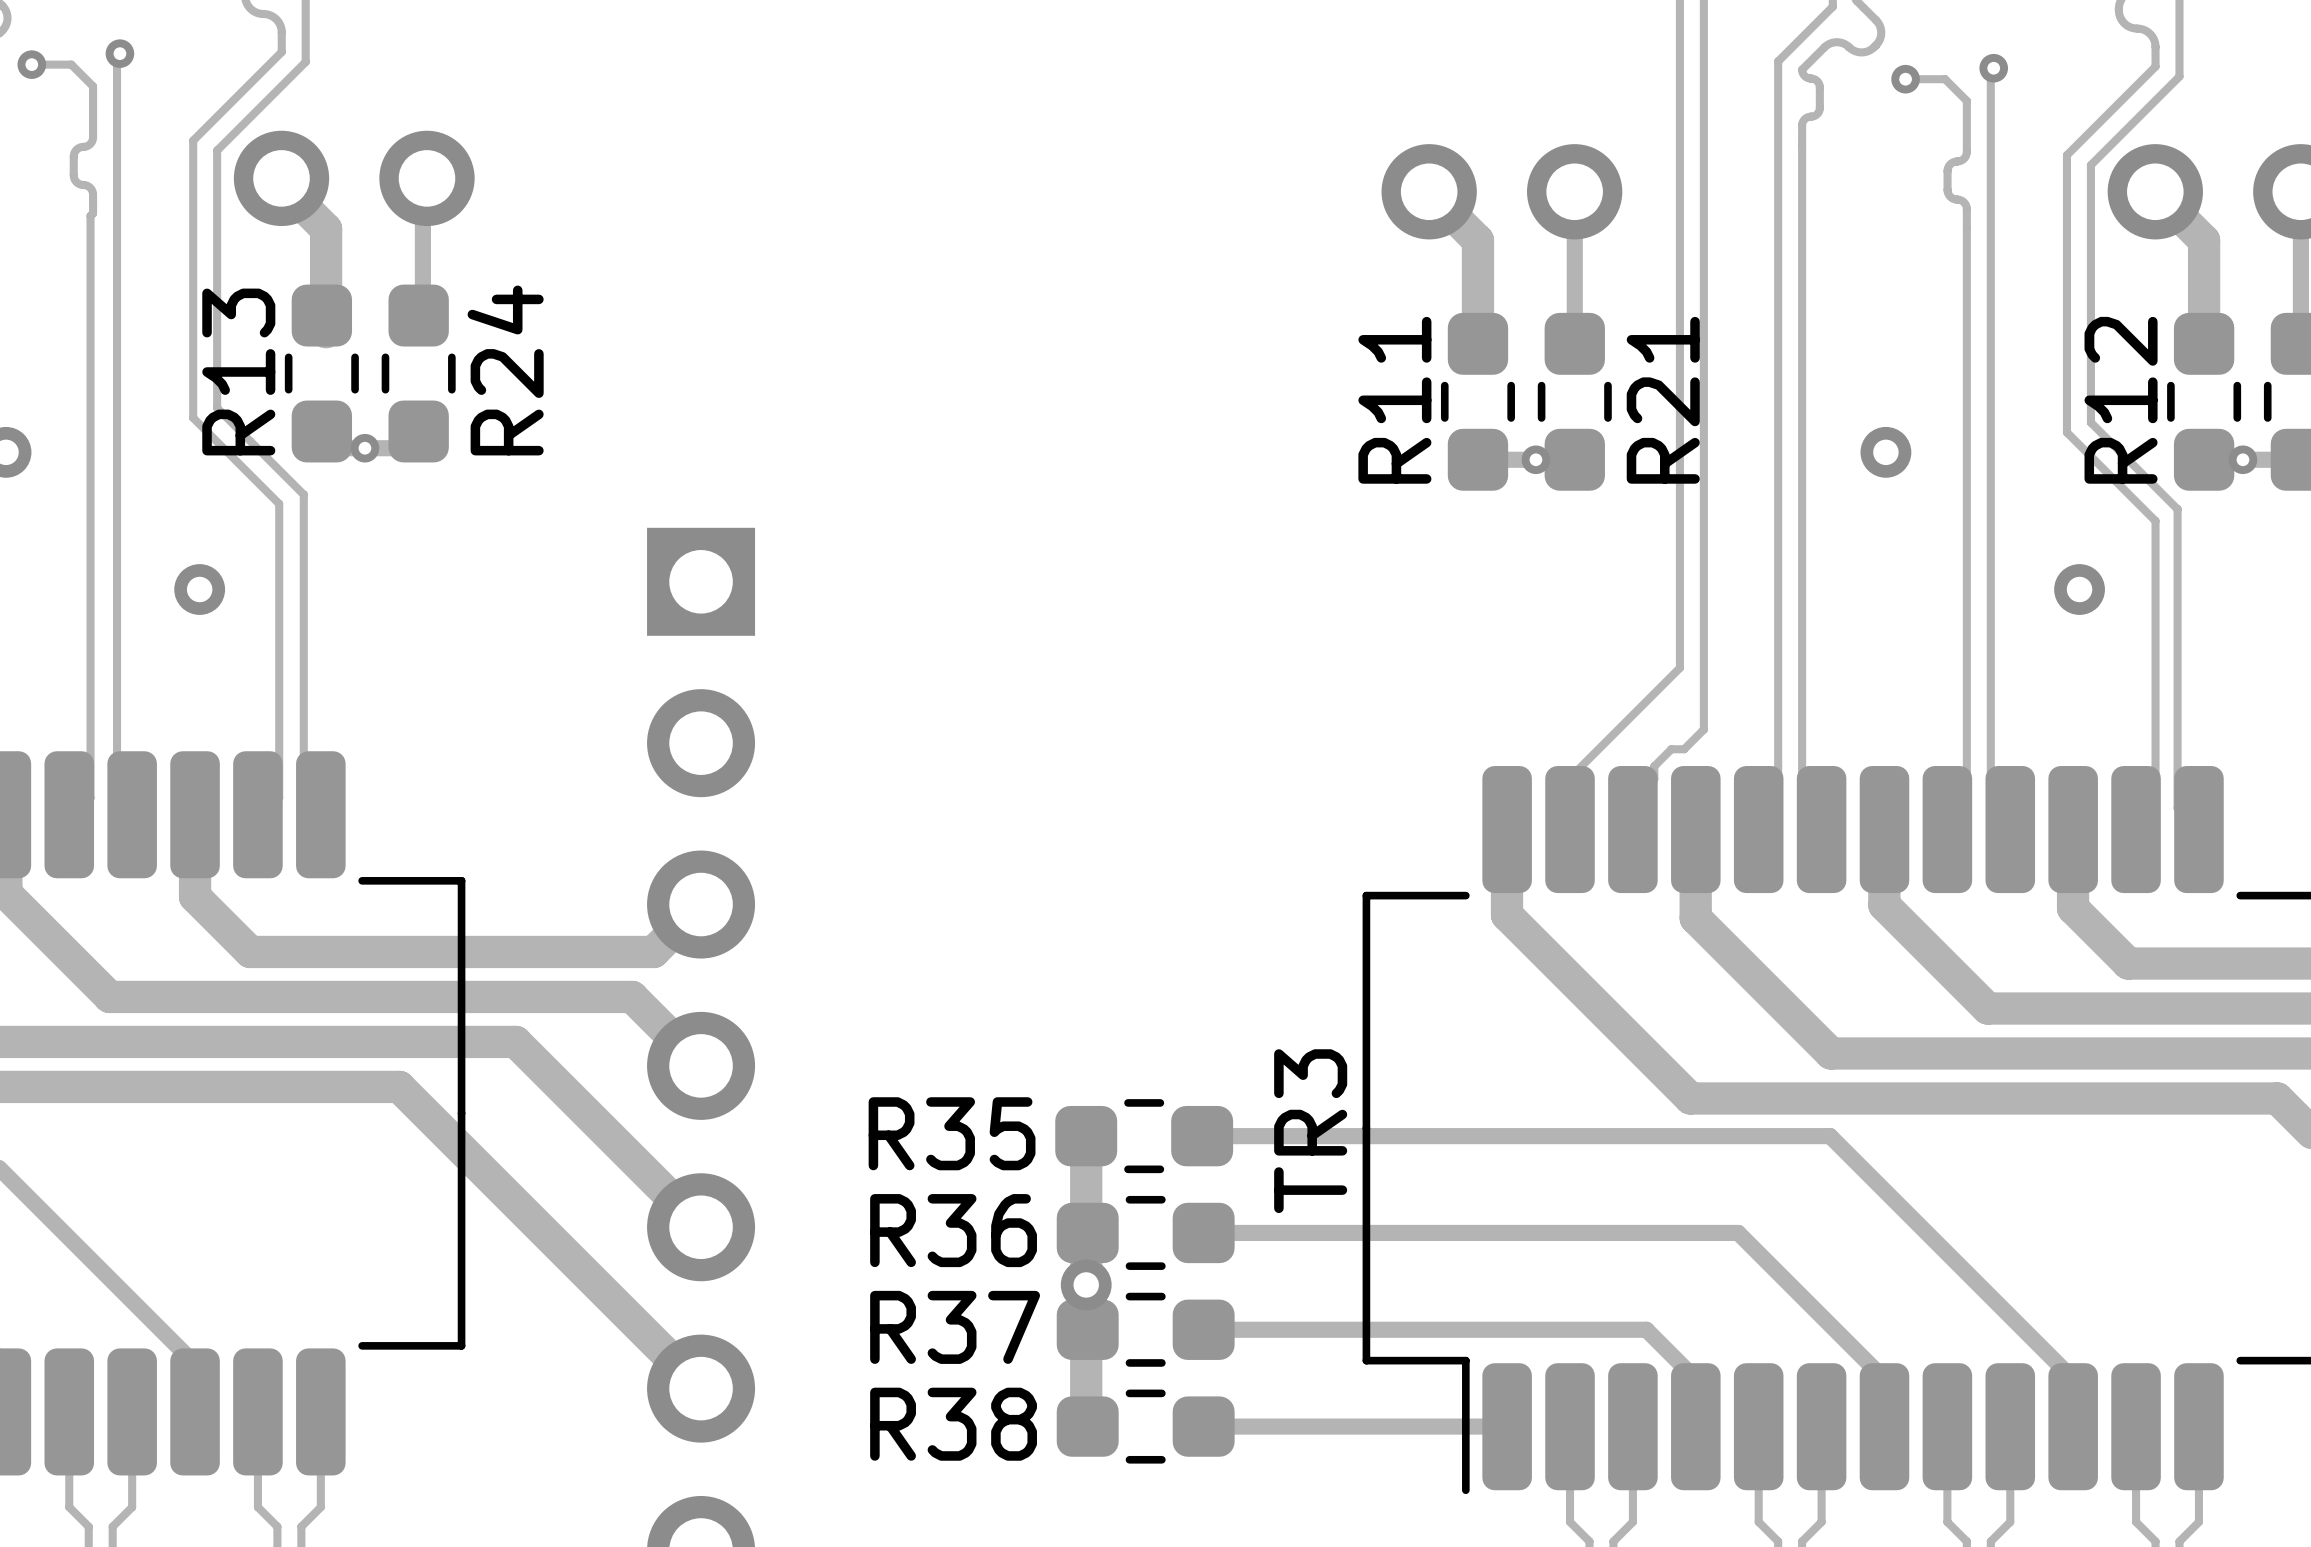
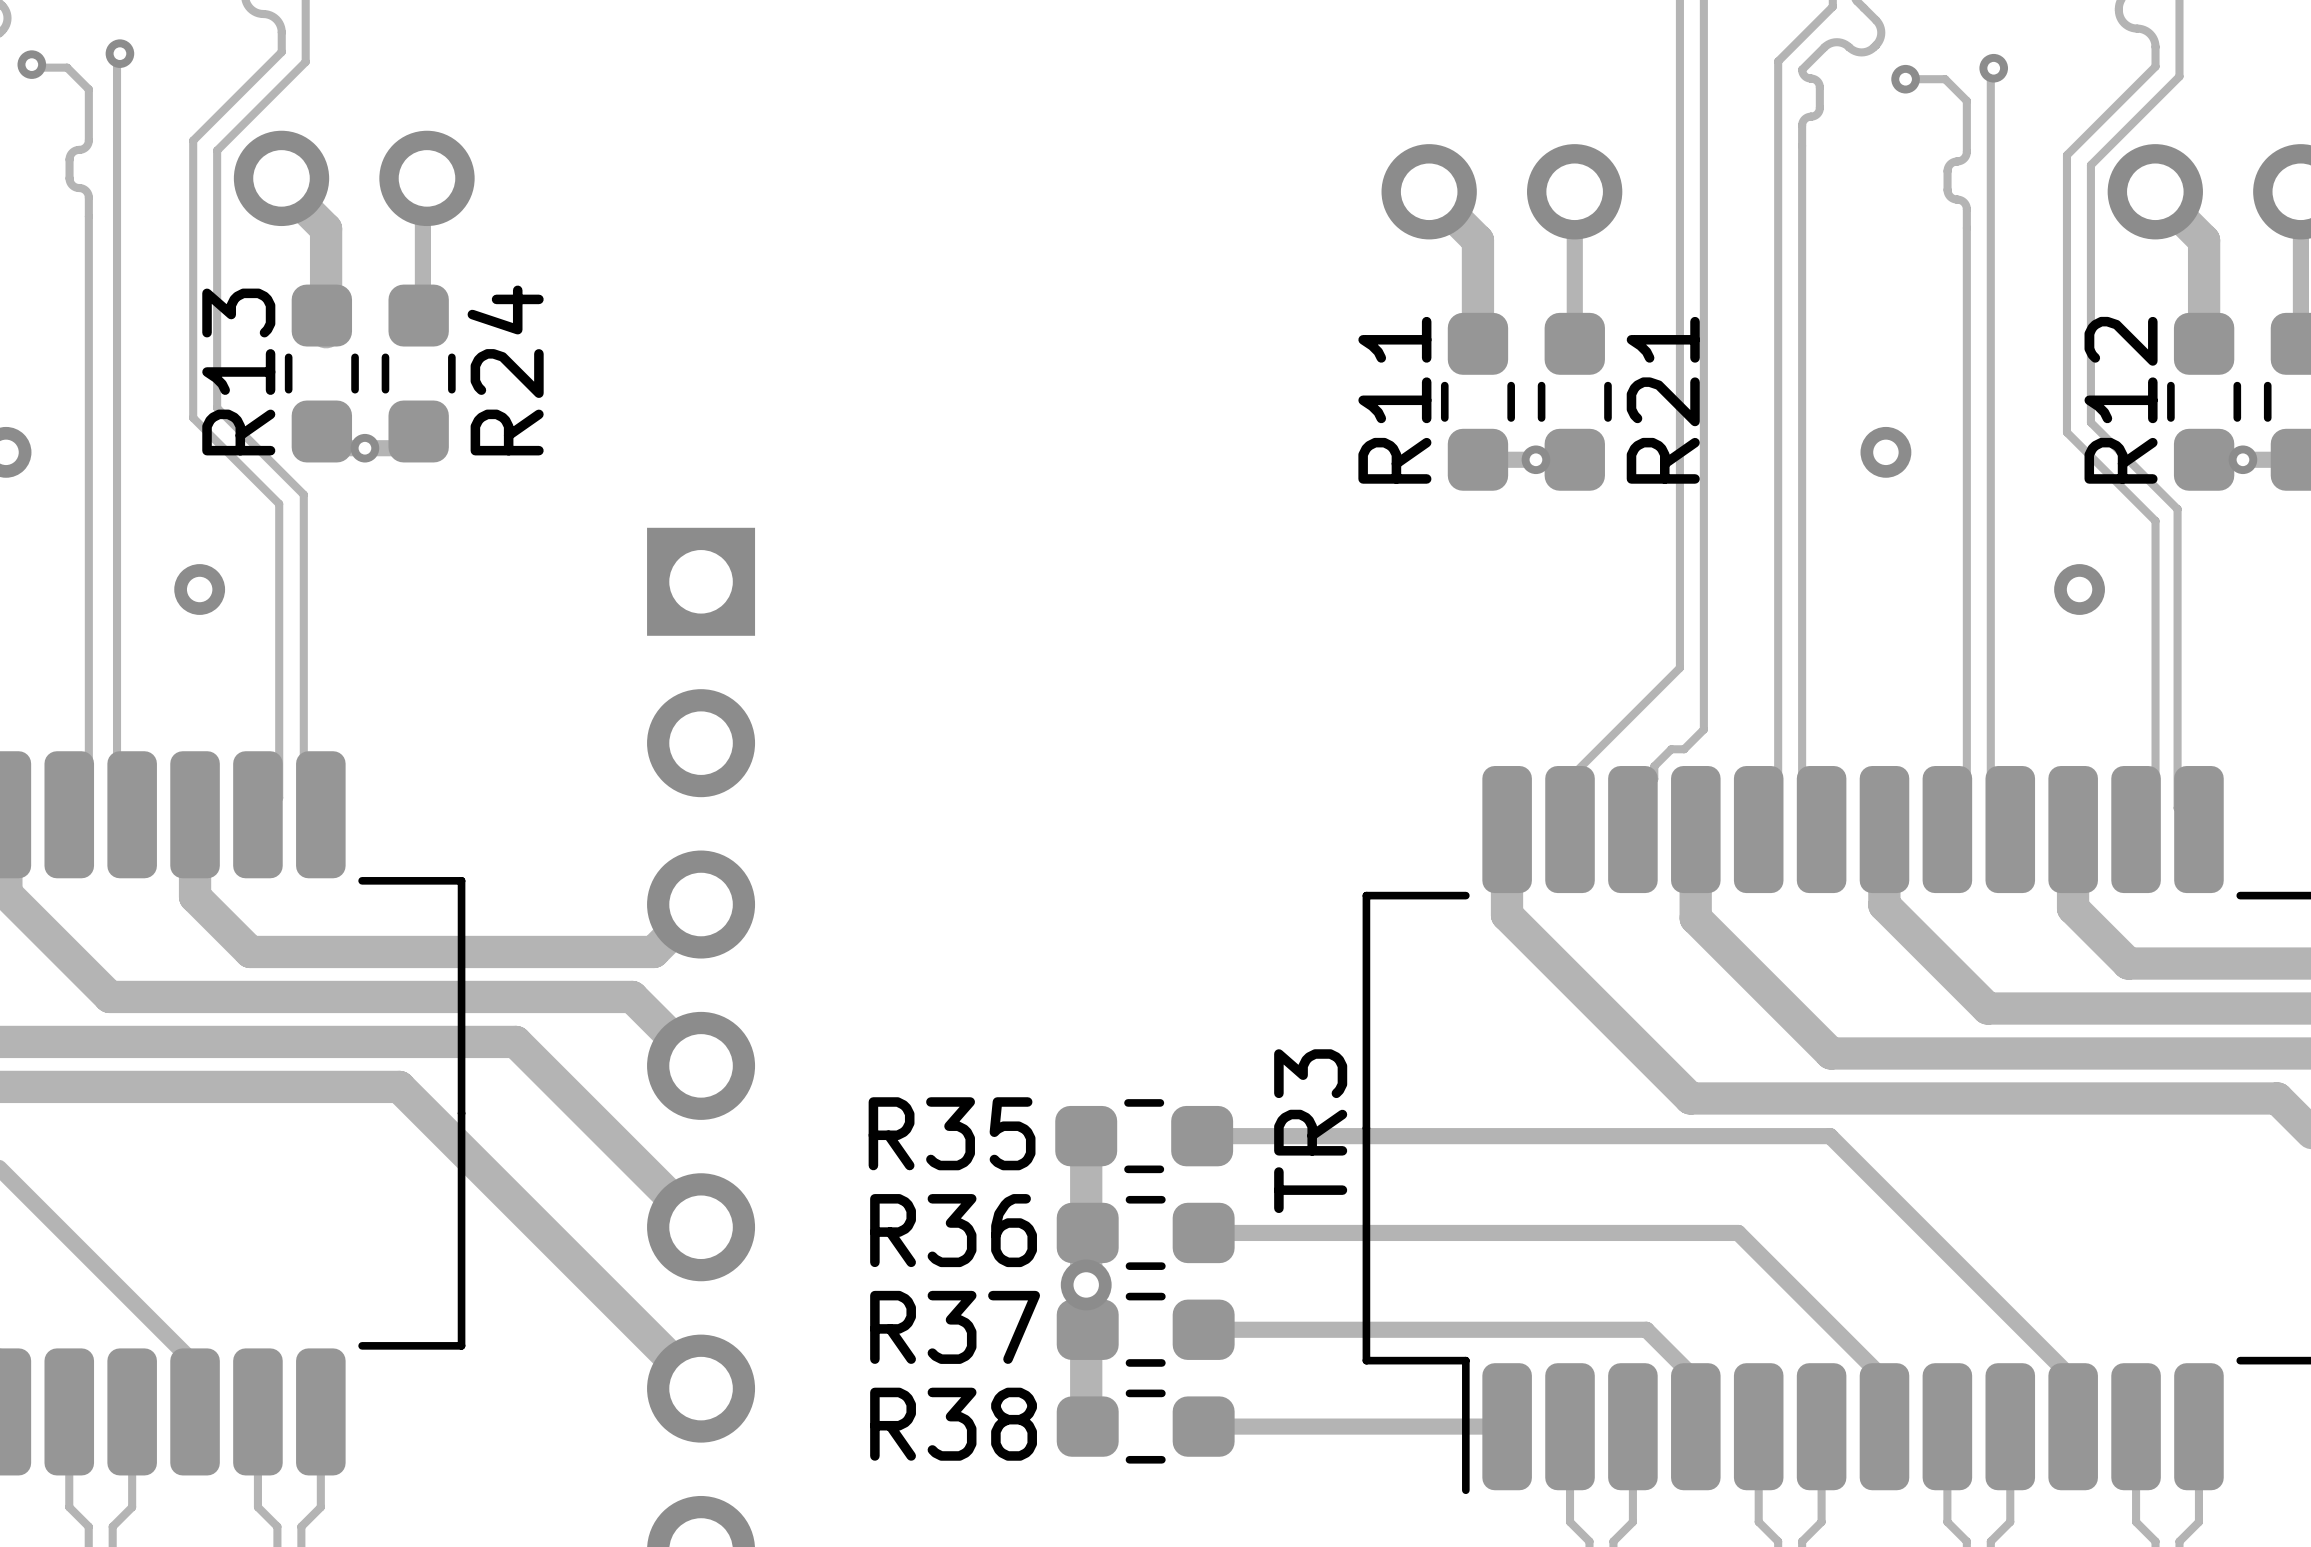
track: (31, 64) (71, 64) (93, 86) (92, 139) (88, 145) (76, 149) (73, 156) (74, 178) (78, 183) (87, 185) (92, 190) (93, 213) (90, 216) (90, 798) (73, 814) -> none
track: none -> (27, 67) (67, 67) (88, 89) (88, 142) (84, 148) (72, 152) (69, 159) (70, 182) (75, 187) (85, 190) (88, 197) (88, 798) (69, 817)

